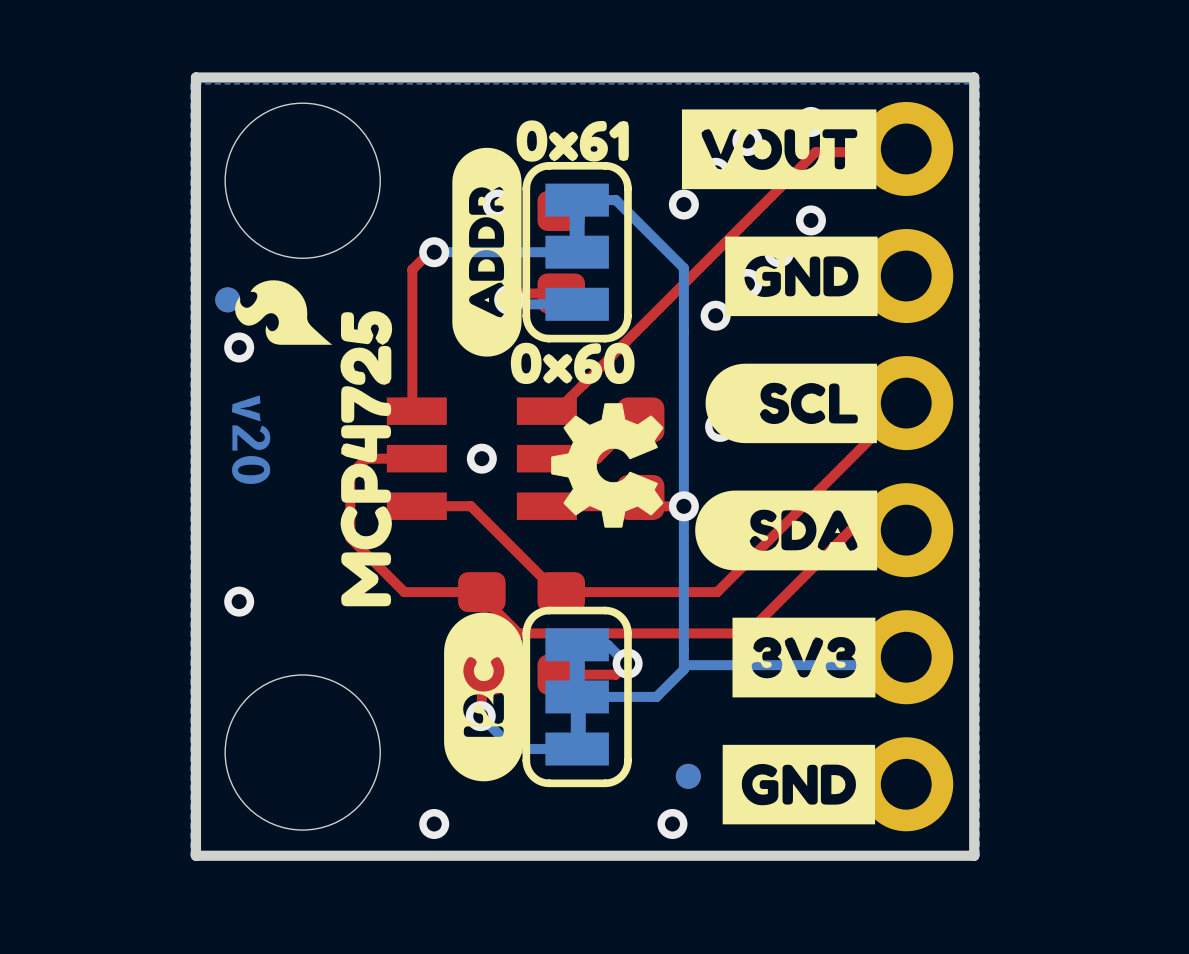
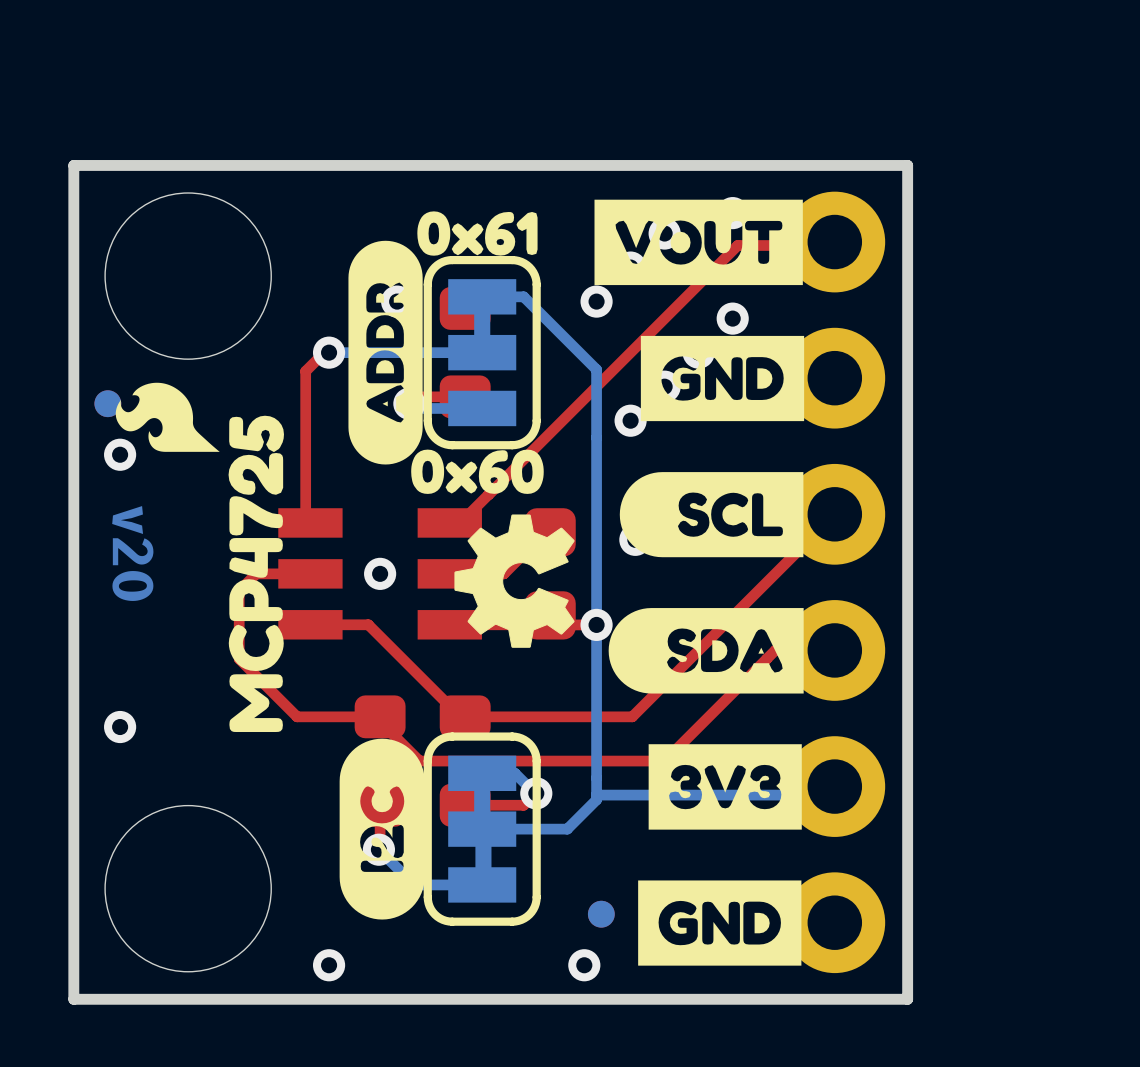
bottom zone outline: (979, 83) (979, 856) (190, 856) (190, 83) (979, 83) -> none

